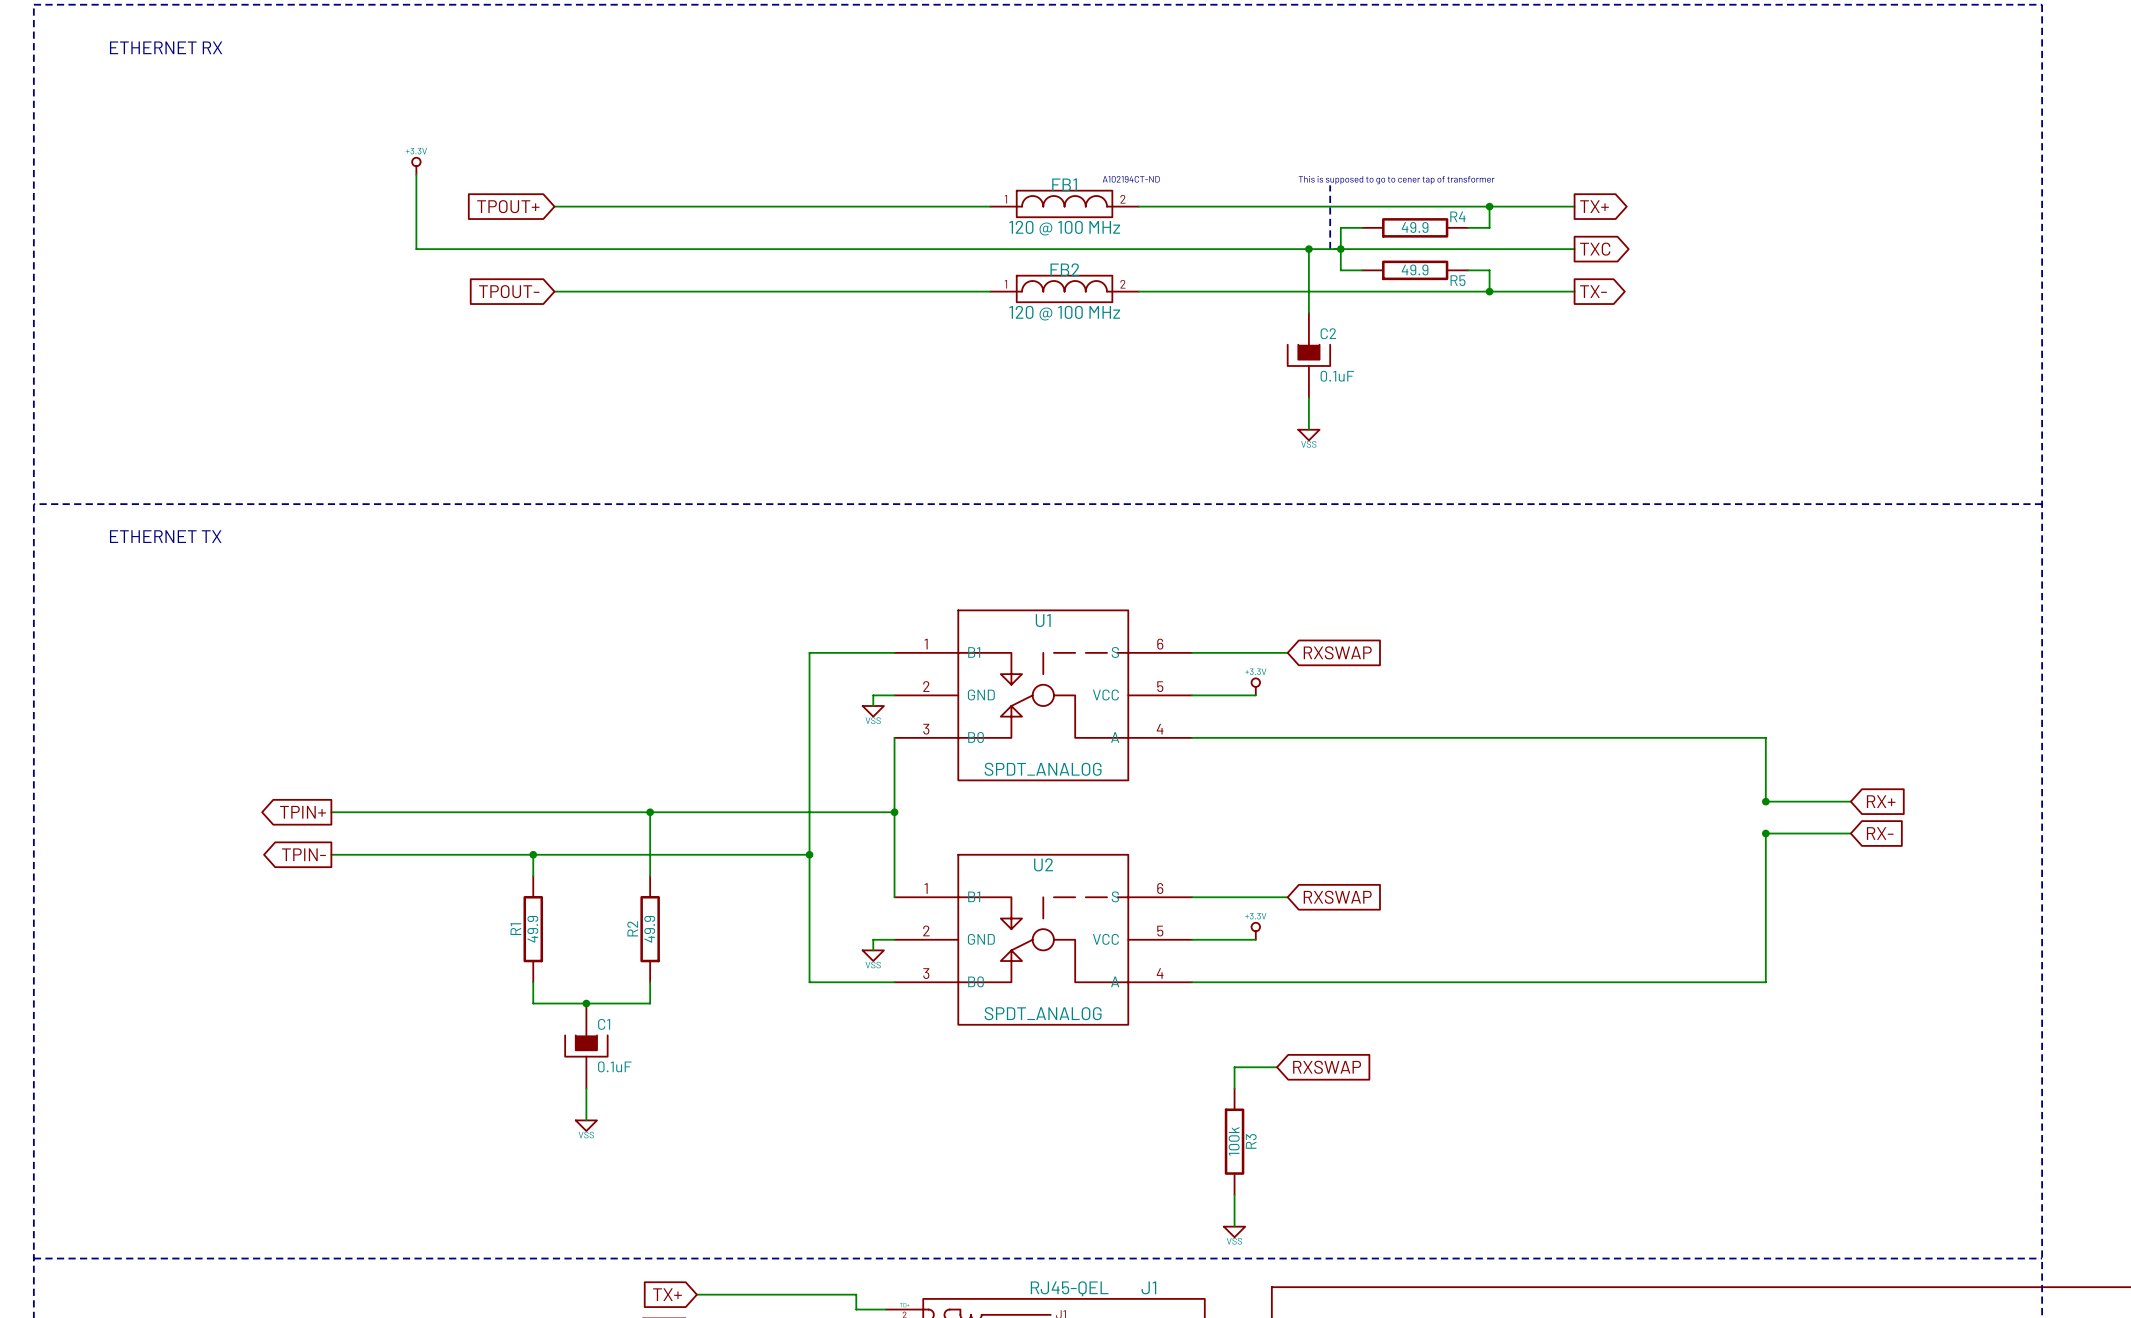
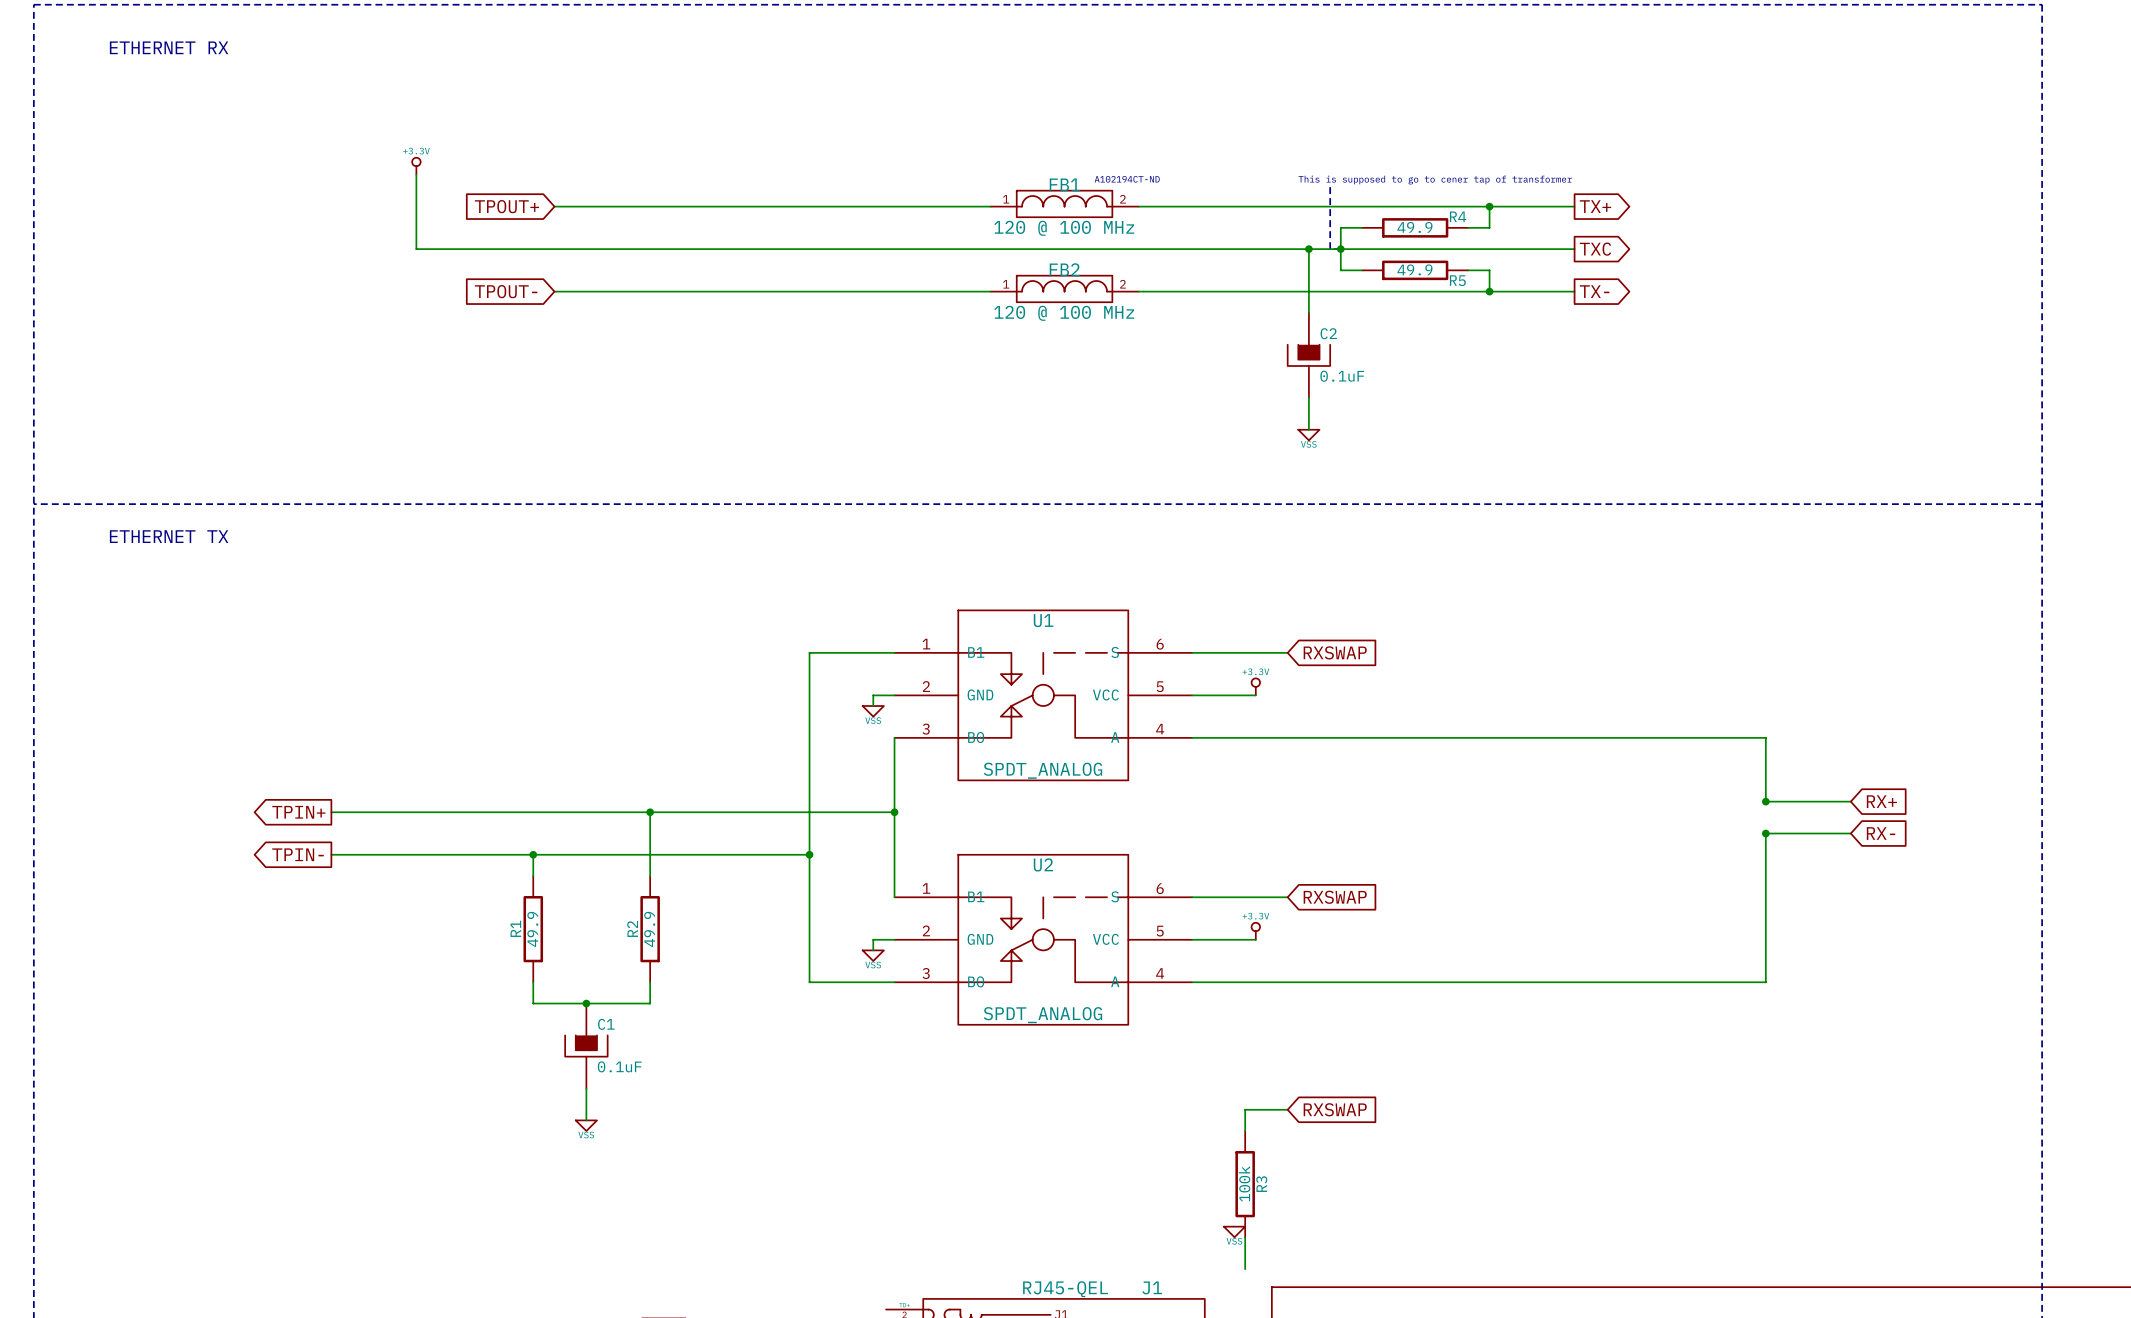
wire: (1277, 1067) (1234, 1067) (1234, 1088) -> (1287, 1109) (1245, 1109) (1245, 1131)
global label position: RXSWAP (1327, 1067) -> RXSWAP (1335, 1109)
R3 position: (1234, 1141) -> (1245, 1184)
wire: (1234, 1194) (1234, 1226) -> (1245, 1237) (1245, 1269)
line: (33, 1258) (2042, 1258) -> none
global label: TX+ (667, 1294) -> none
wire: (696, 1294) (856, 1294) (856, 1309) (886, 1309) -> none

